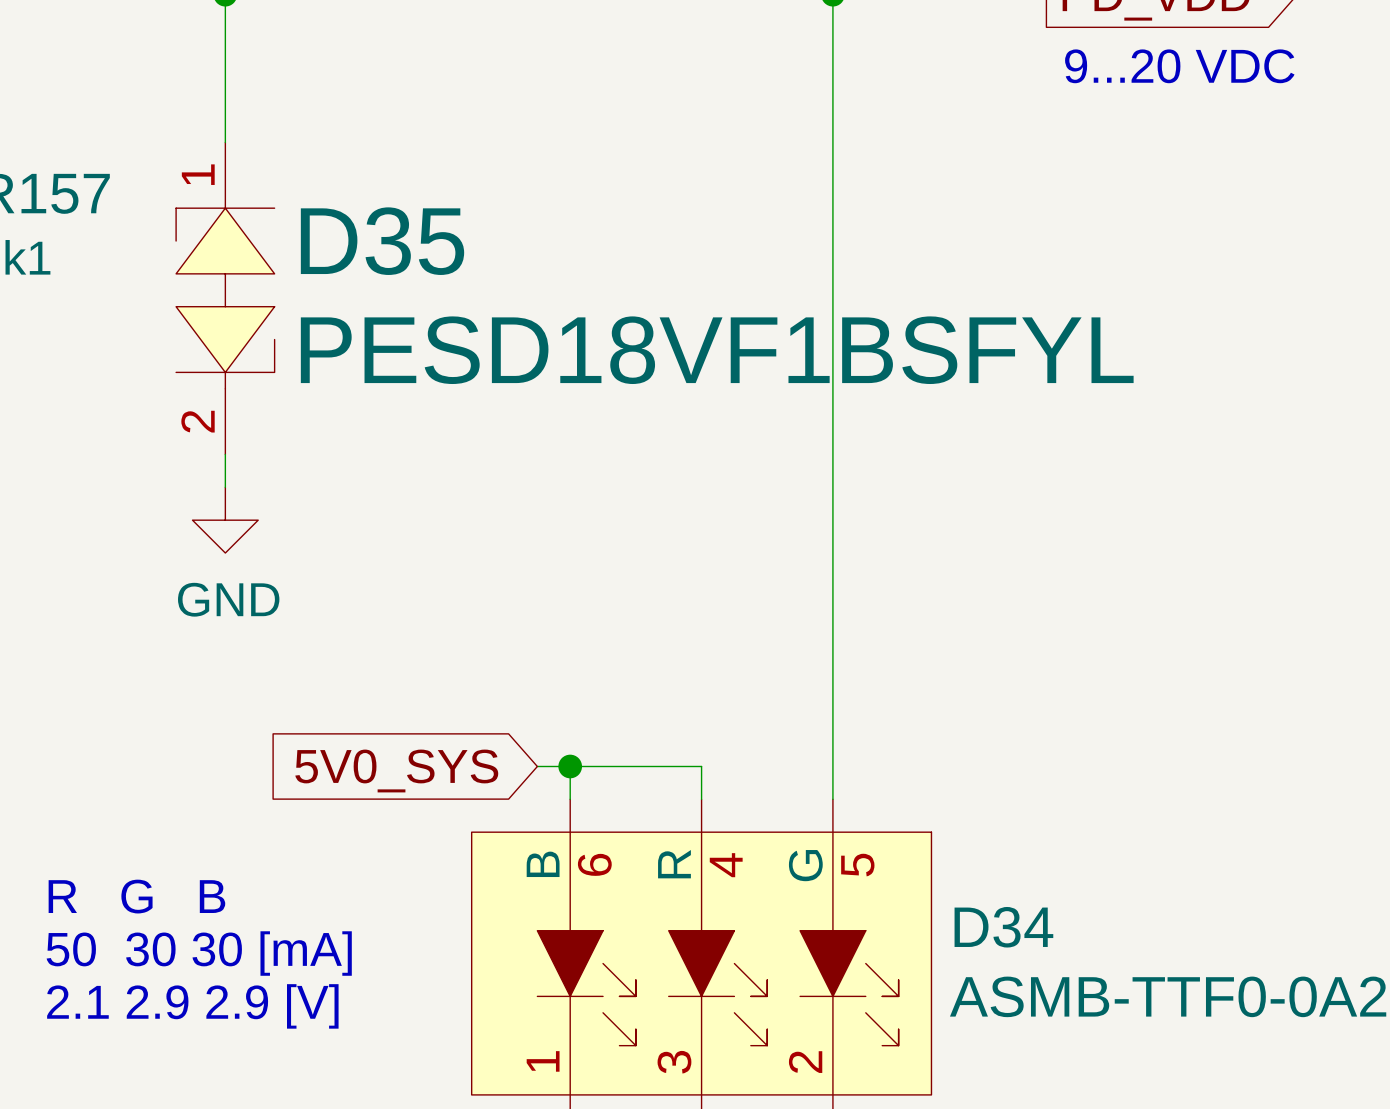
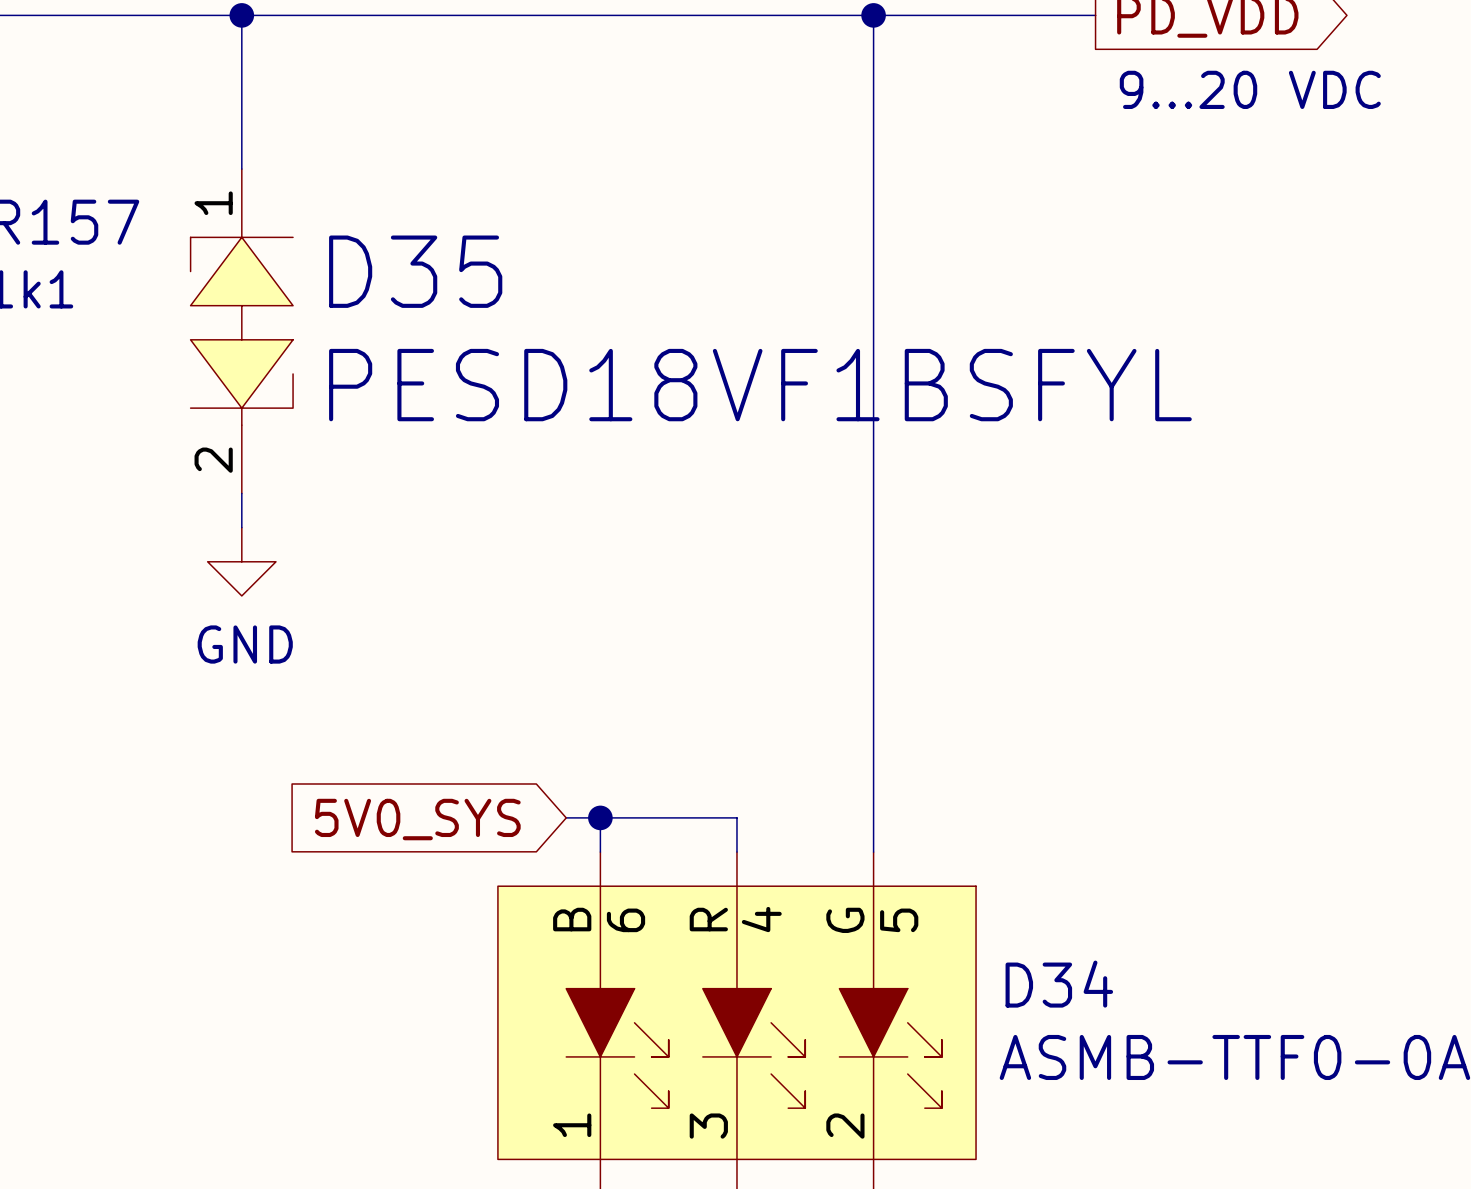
text: R G B (136, 896) -> none
text: 50 30 30 [mA] (199, 953) -> none
text: 2.1 2.9 2.9 [V] (192, 1006) -> none

